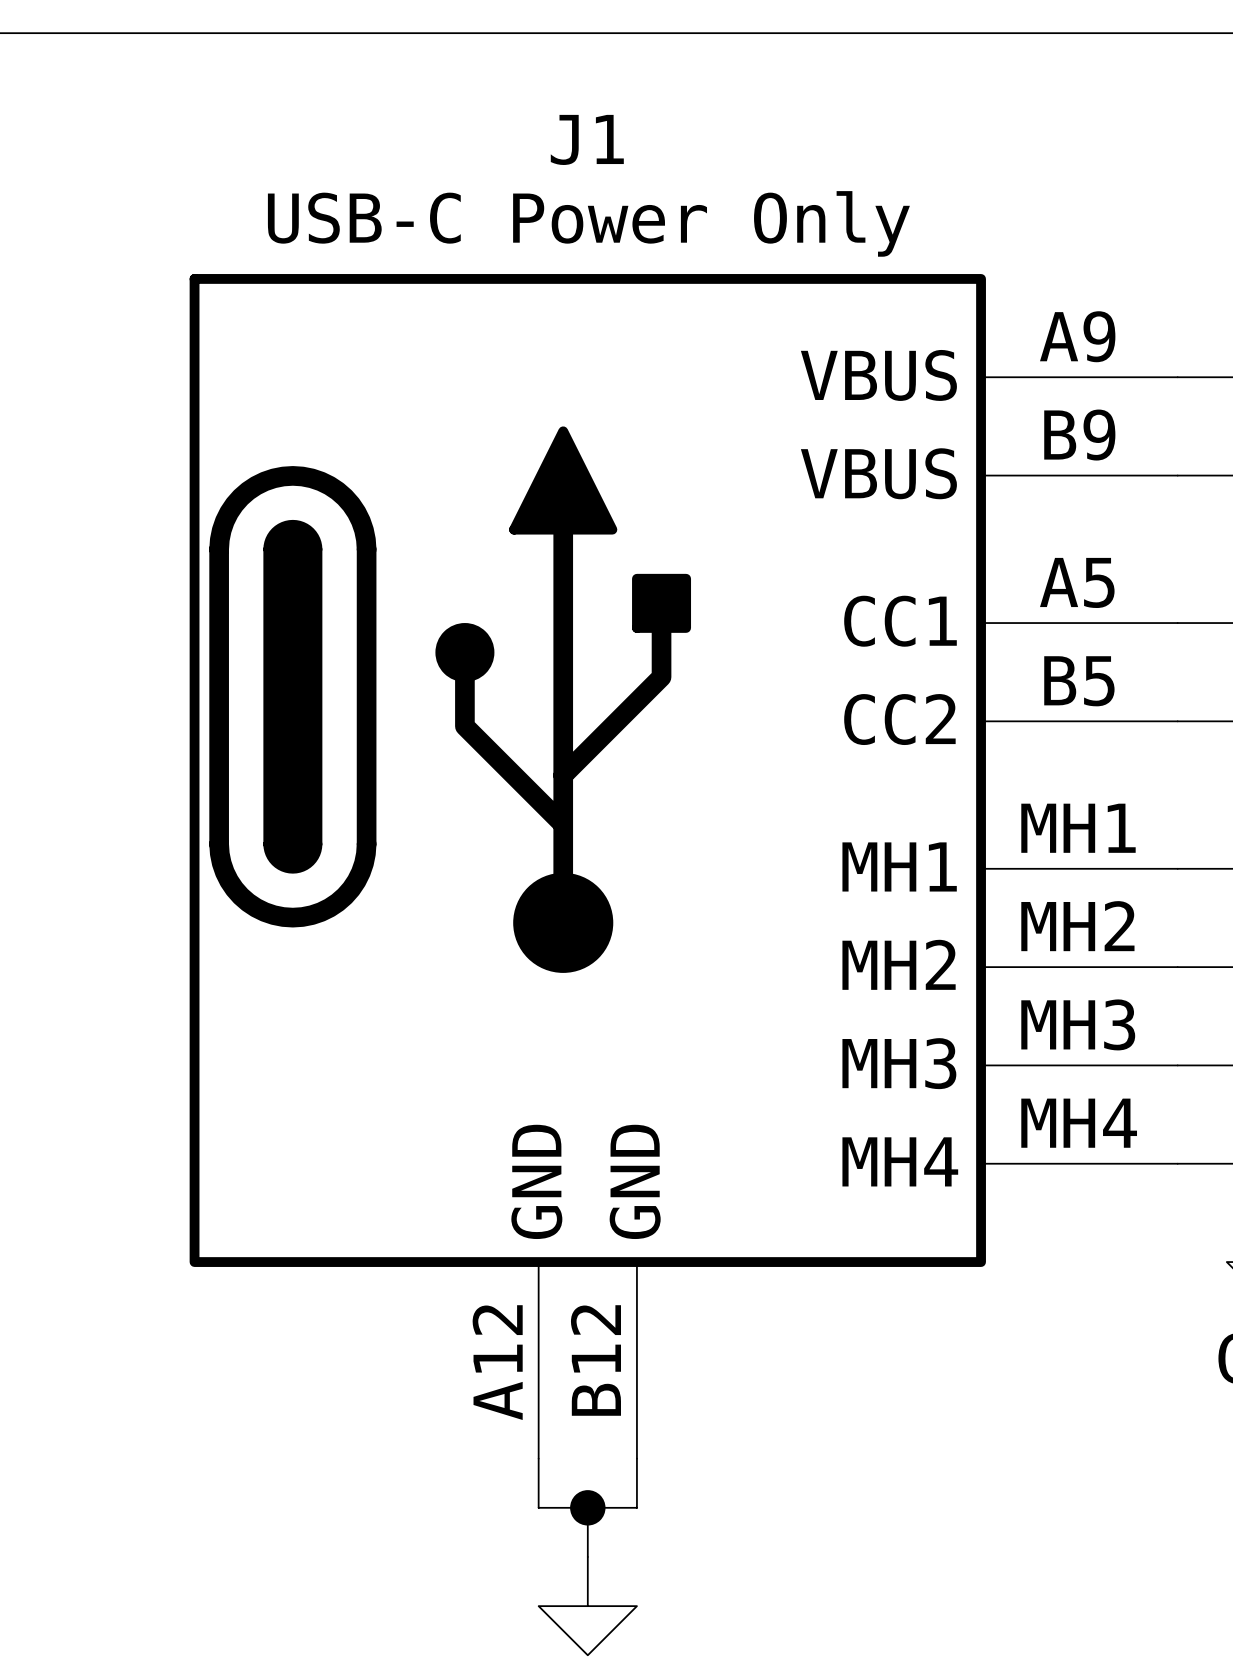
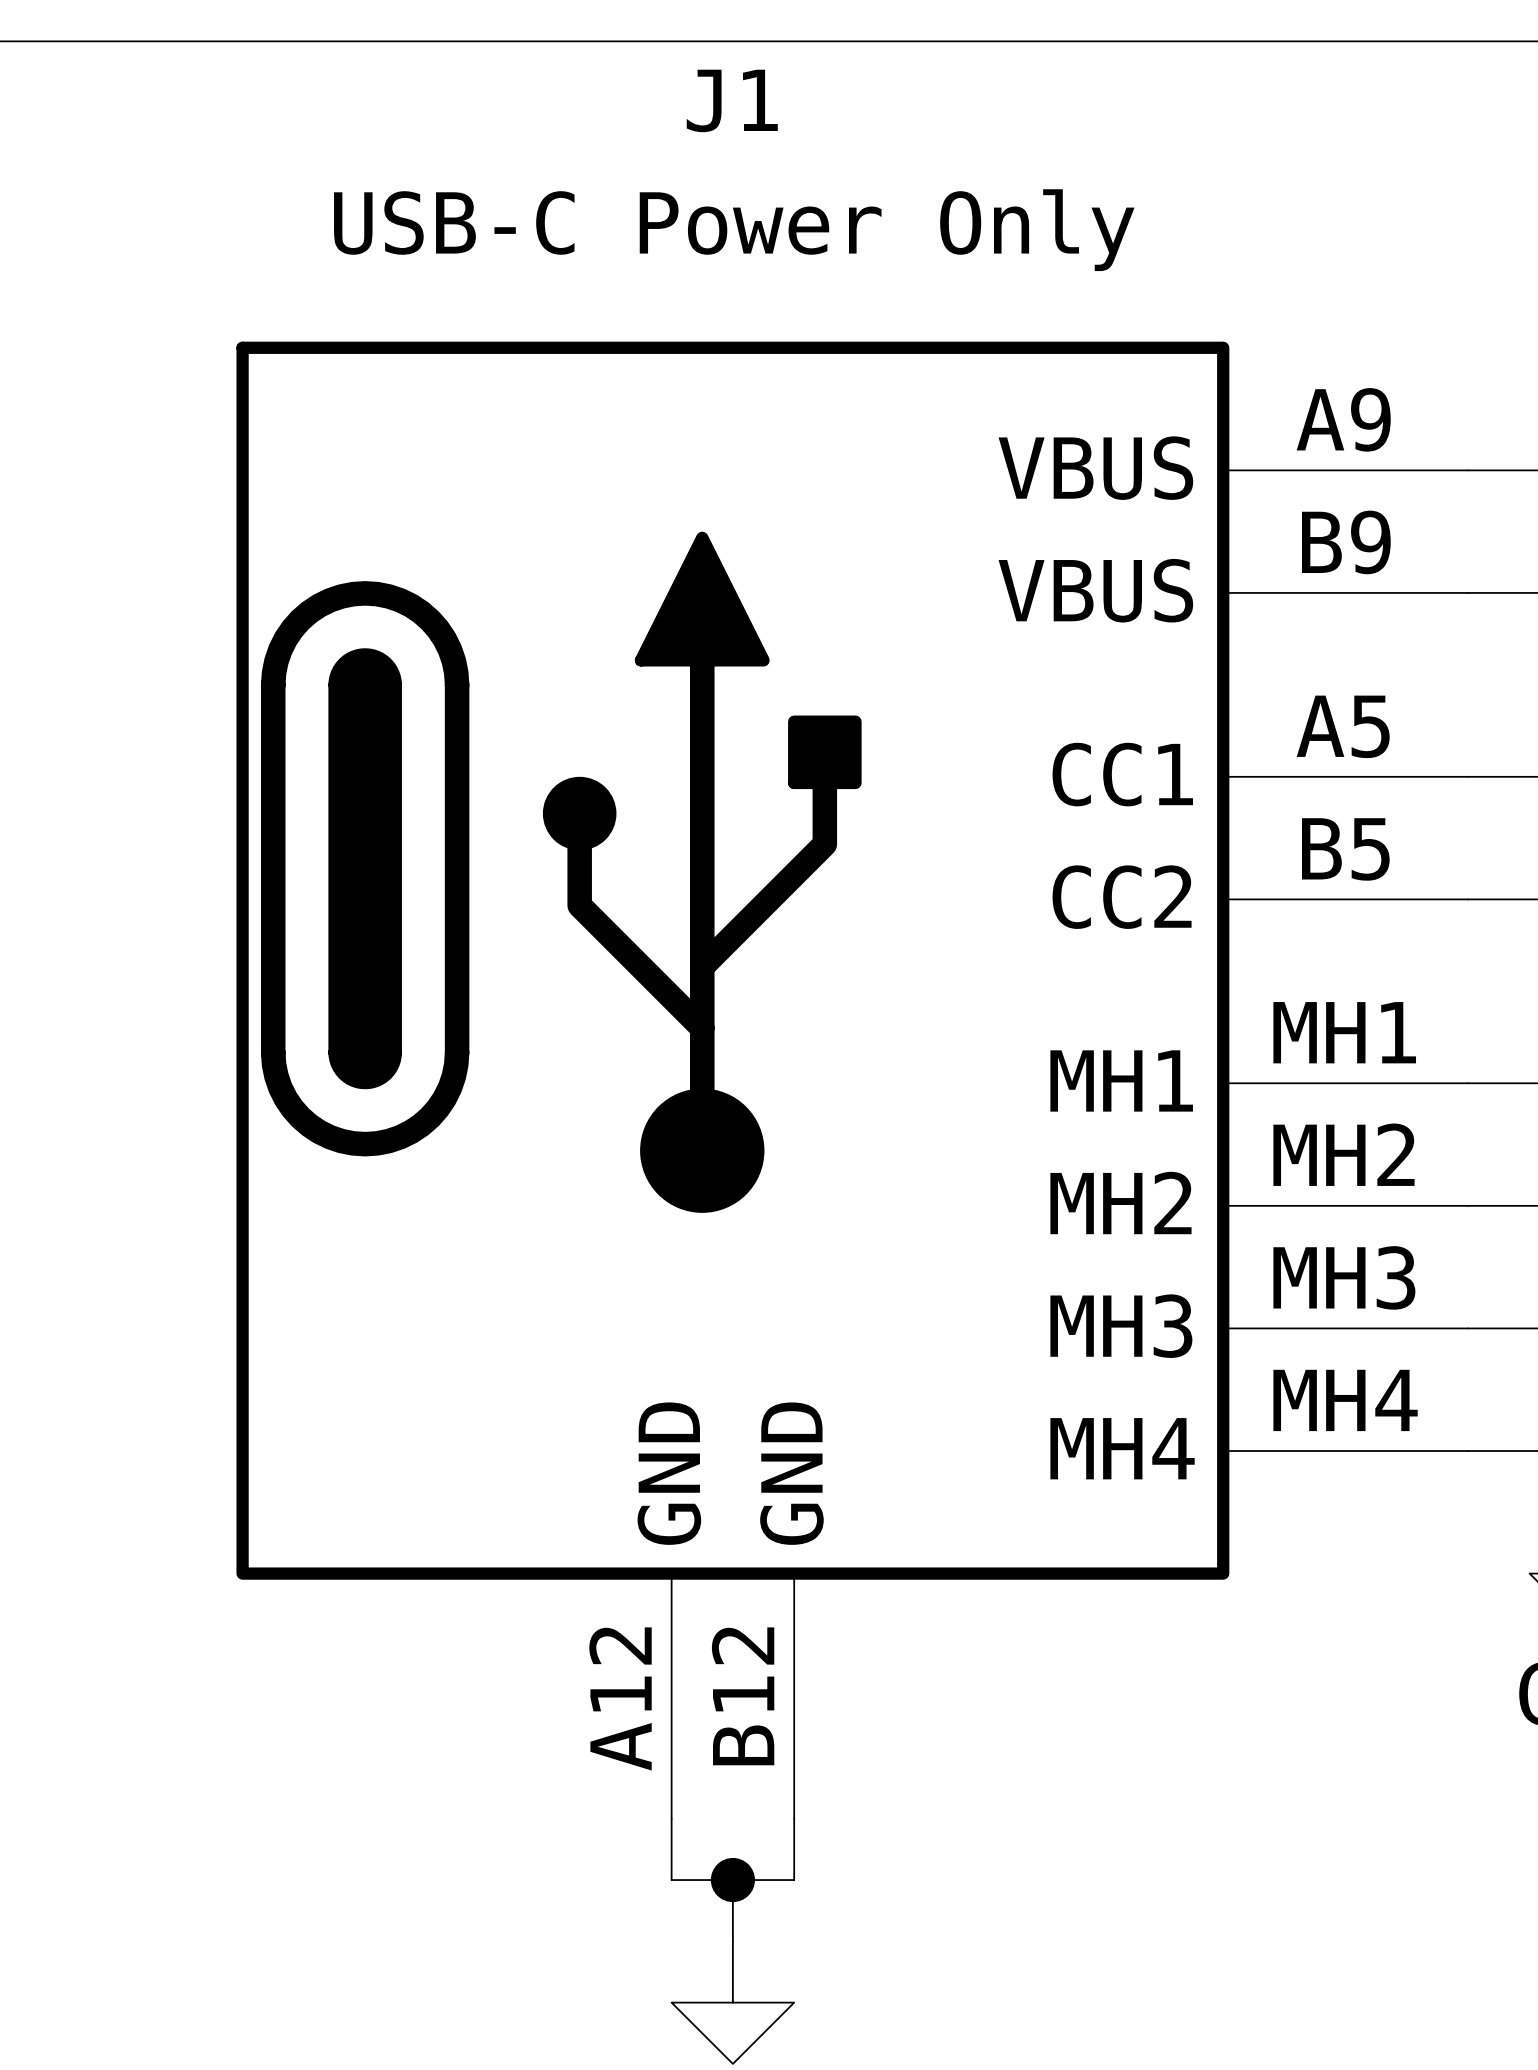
J1 name position: J1 (587, 139) -> J1 (732, 100)
J1 value position: USB-C Power Only (588, 223) -> USB-C Power Only (734, 230)

